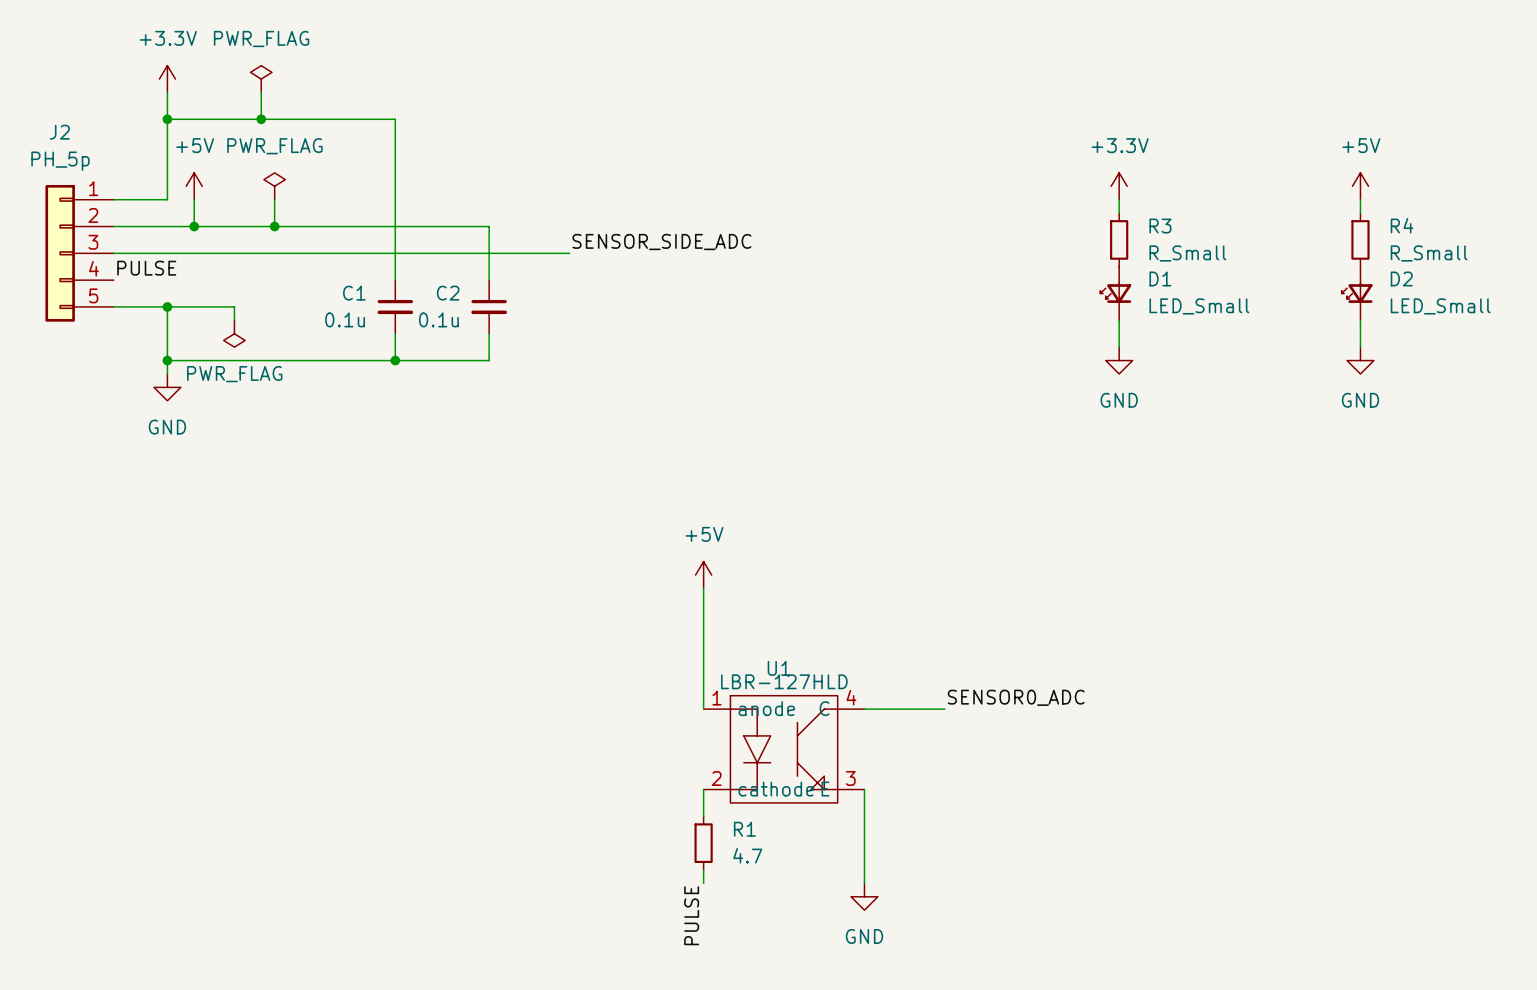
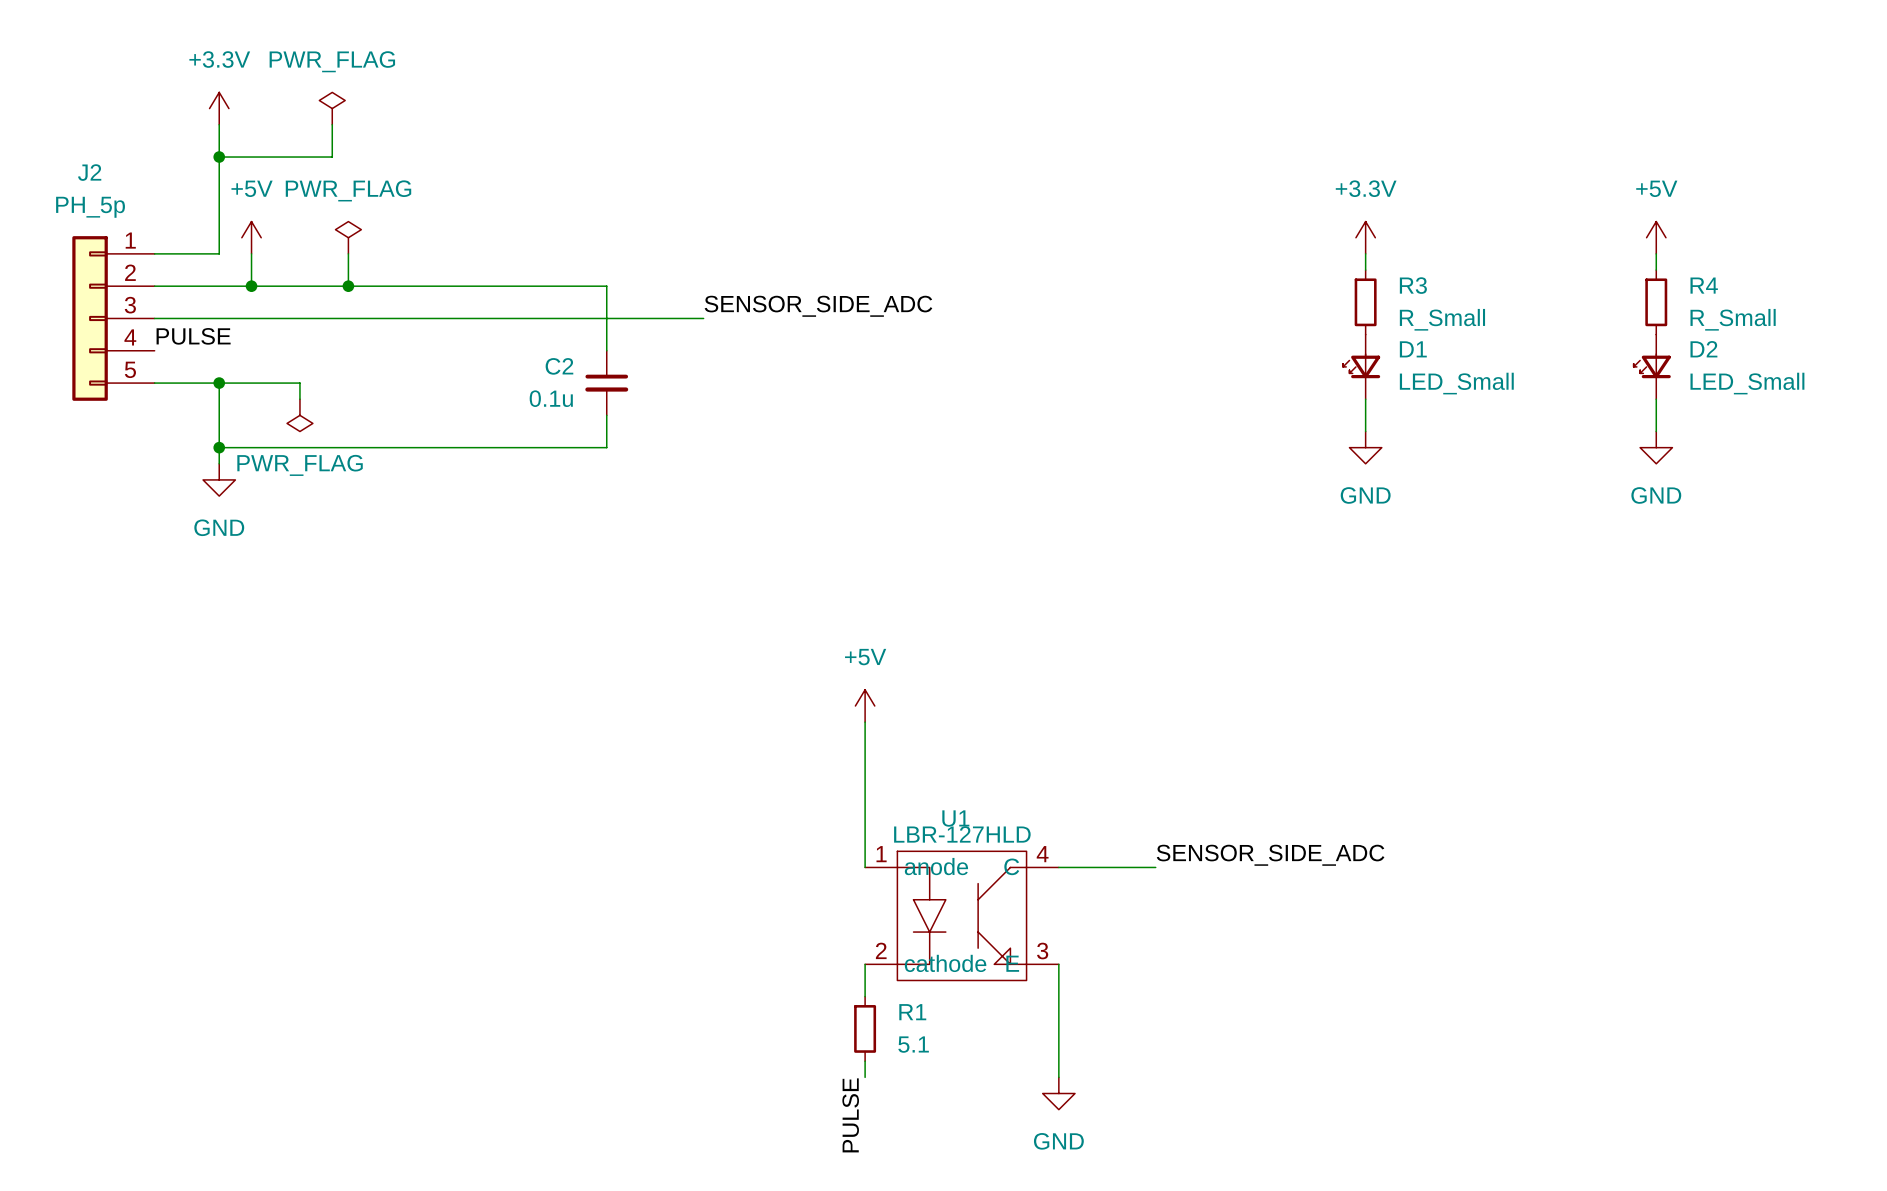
wire: (261, 119) (395, 119) (395, 280) -> none
junction: (261, 119) -> none
C1: 0.1u (395, 306) -> none
wire: (395, 333) (395, 360) -> none
junction: (395, 360) -> none
label: SENSOR0_ADC (1016, 697) -> SENSOR_SIDE_ADC (1270, 855)
R1 value: 4.7 (747, 855) -> 5.1 (913, 1044)

